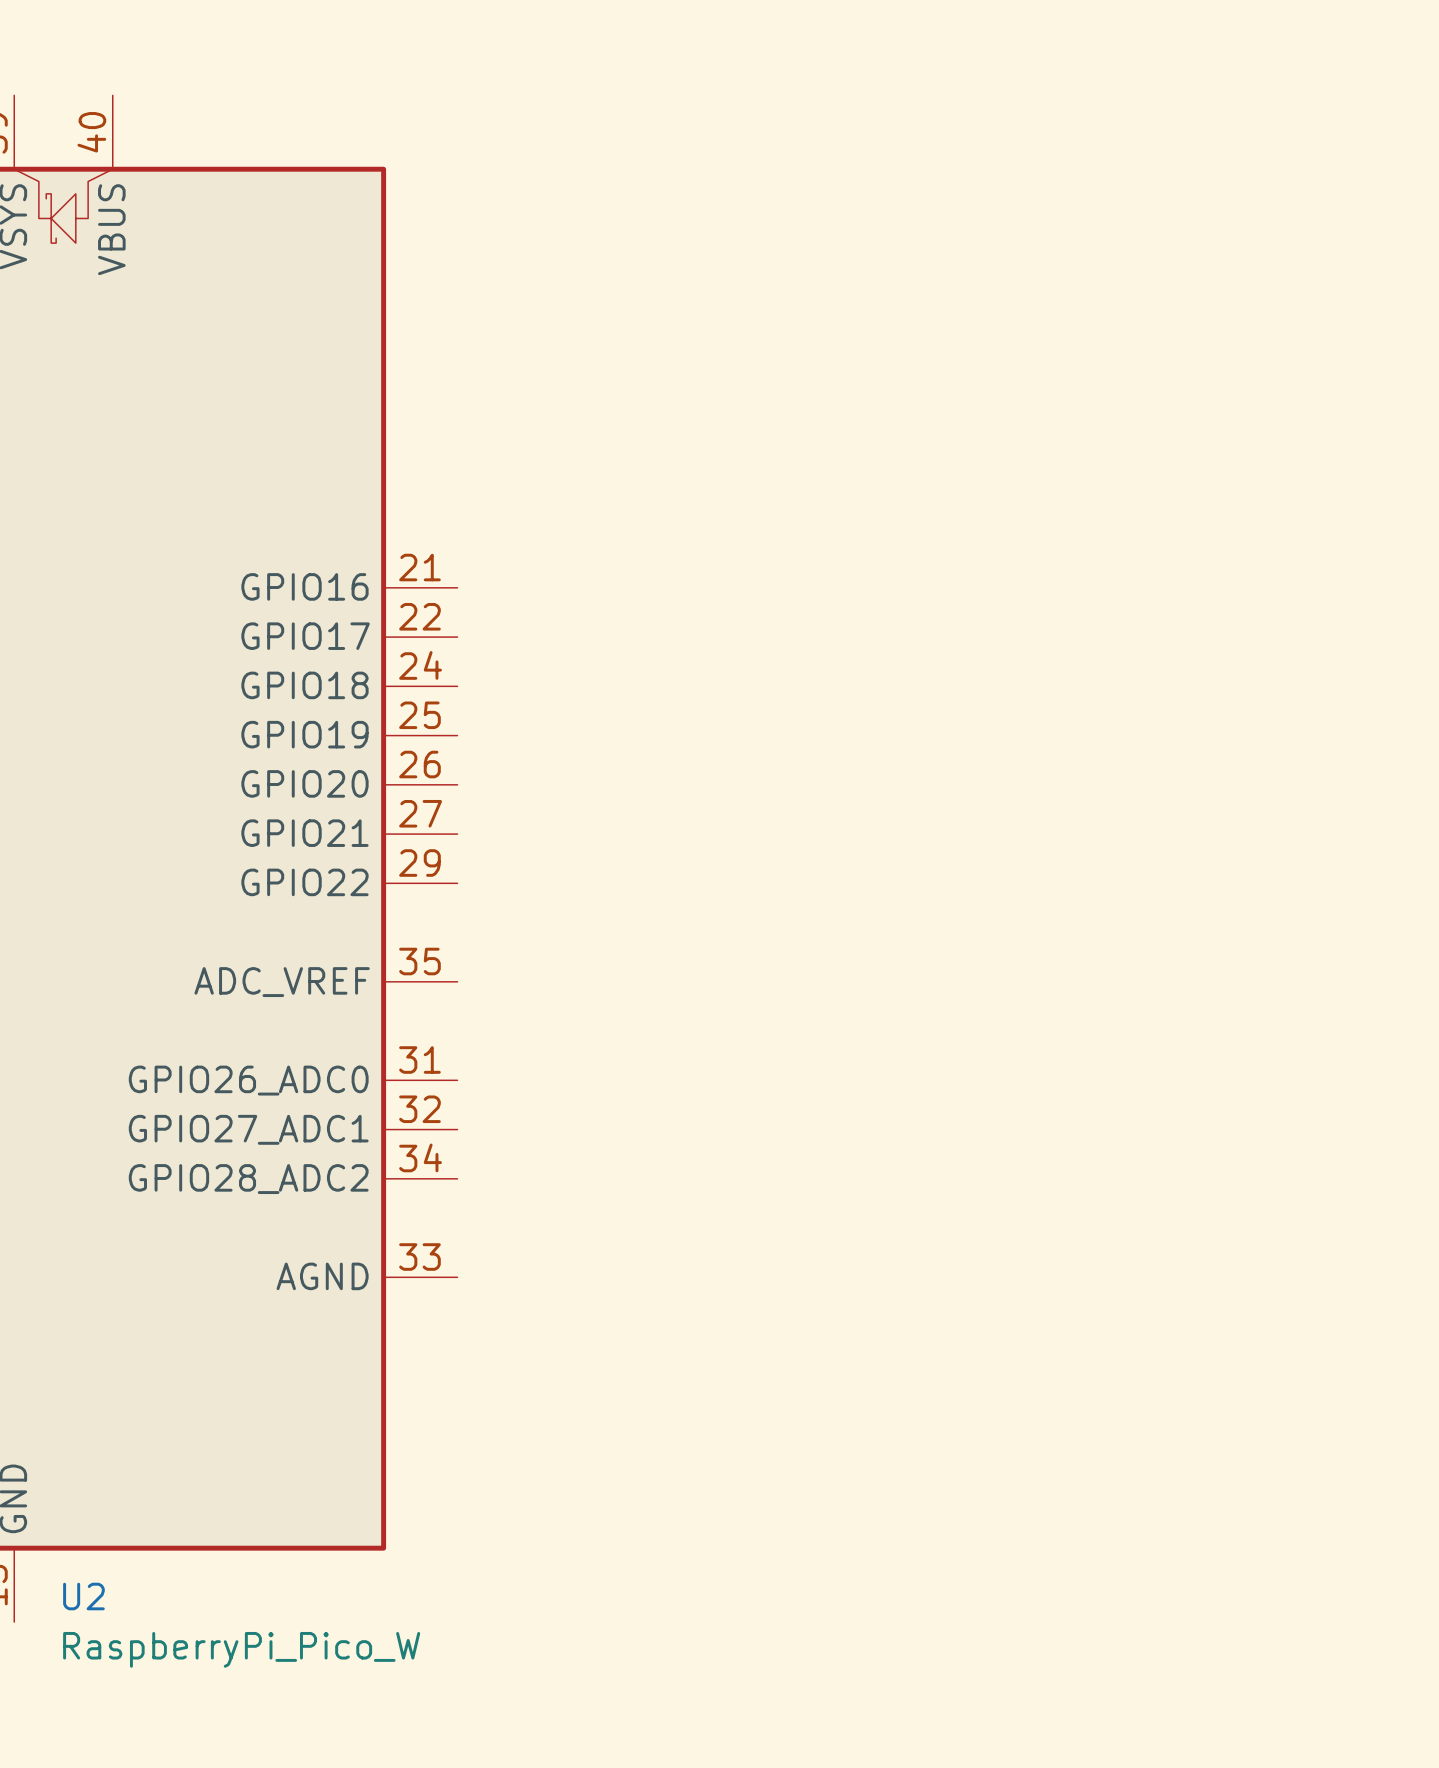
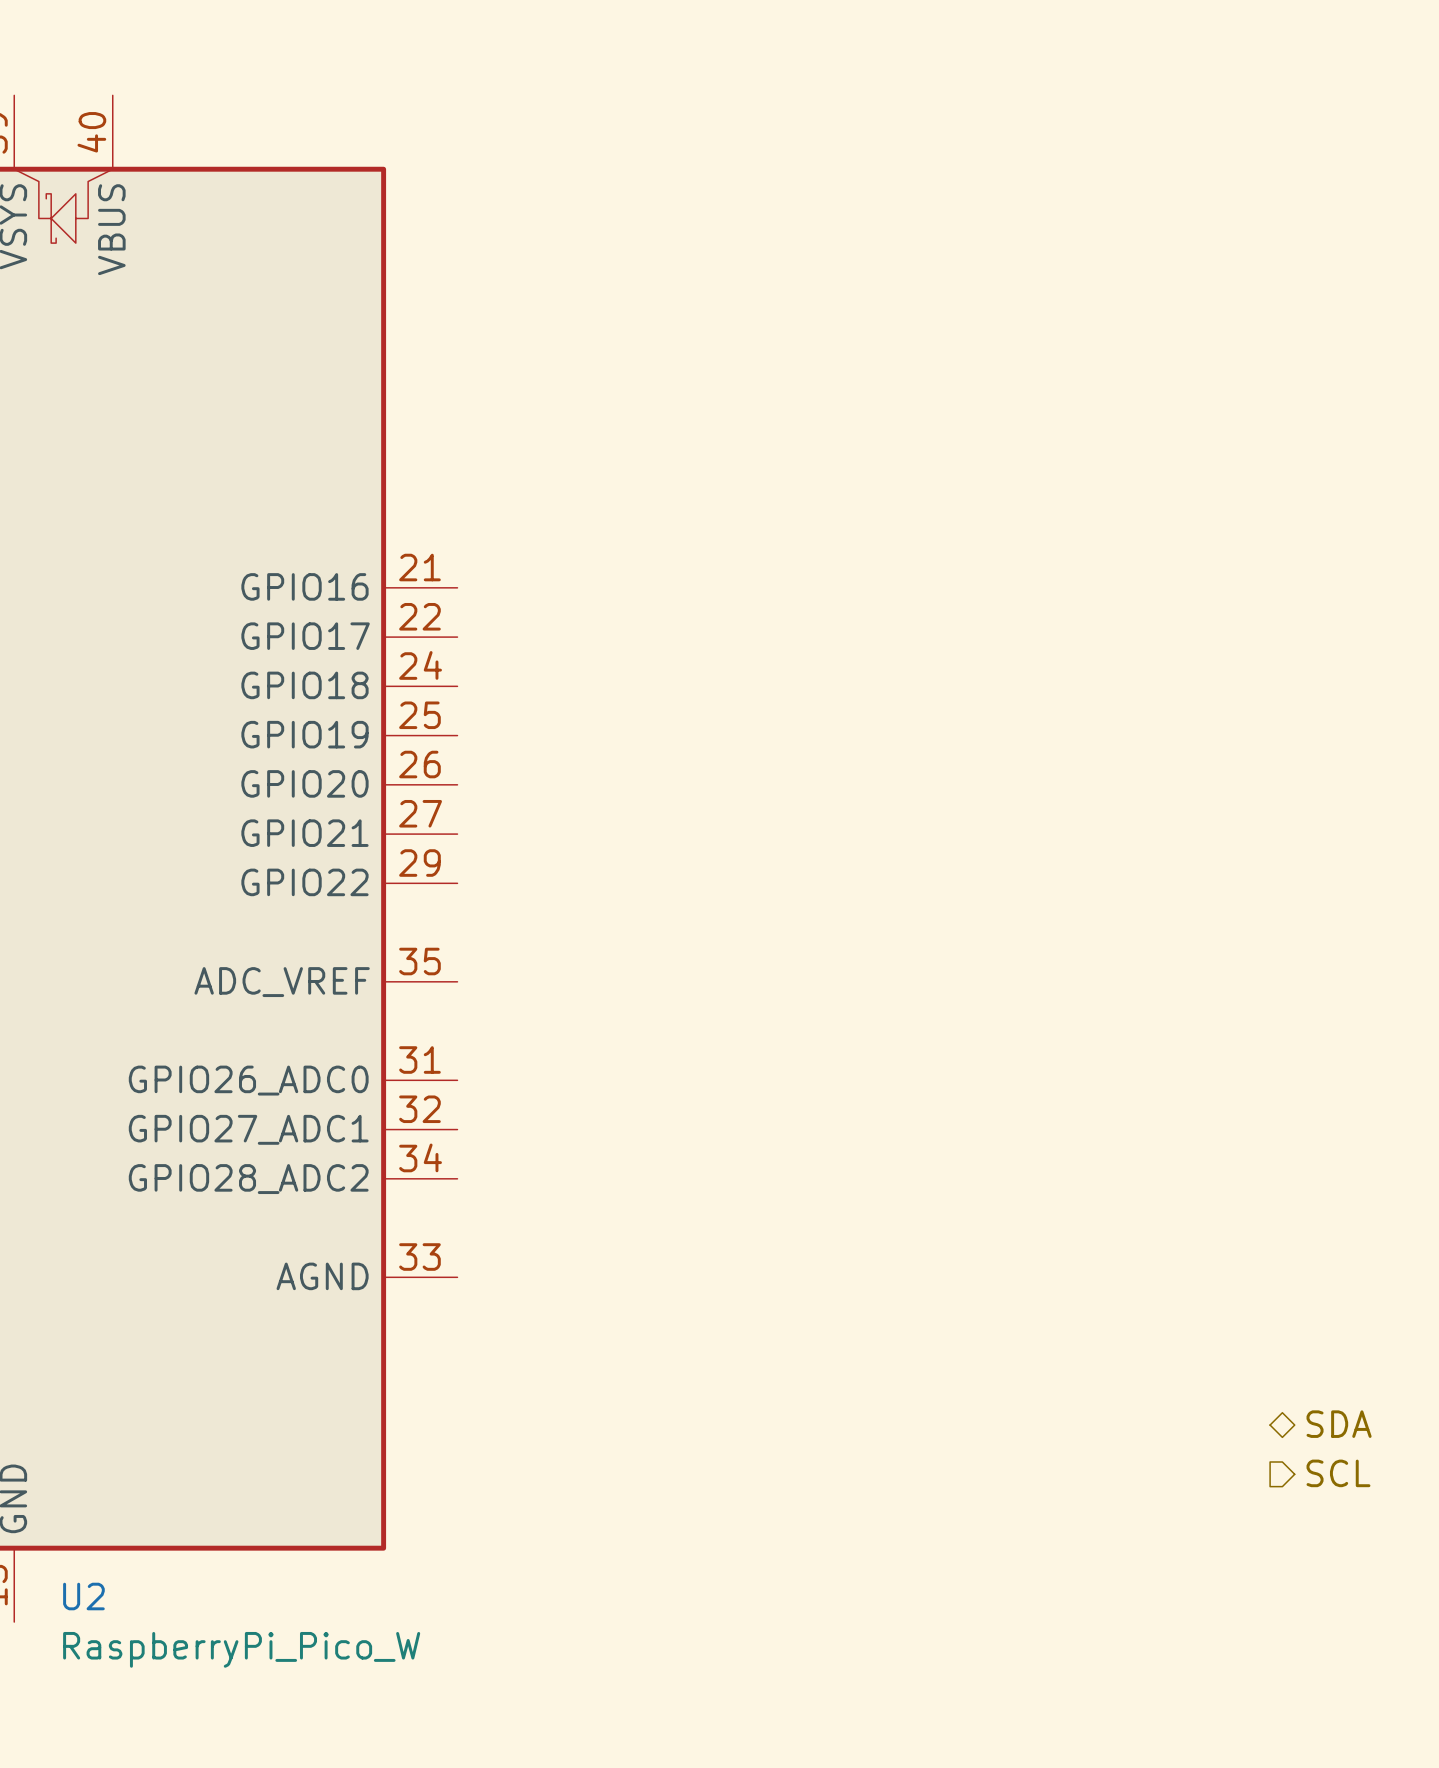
hierarchical label: none -> SDA (1339, 1424)
hierarchical label: none -> SCL (1338, 1473)

